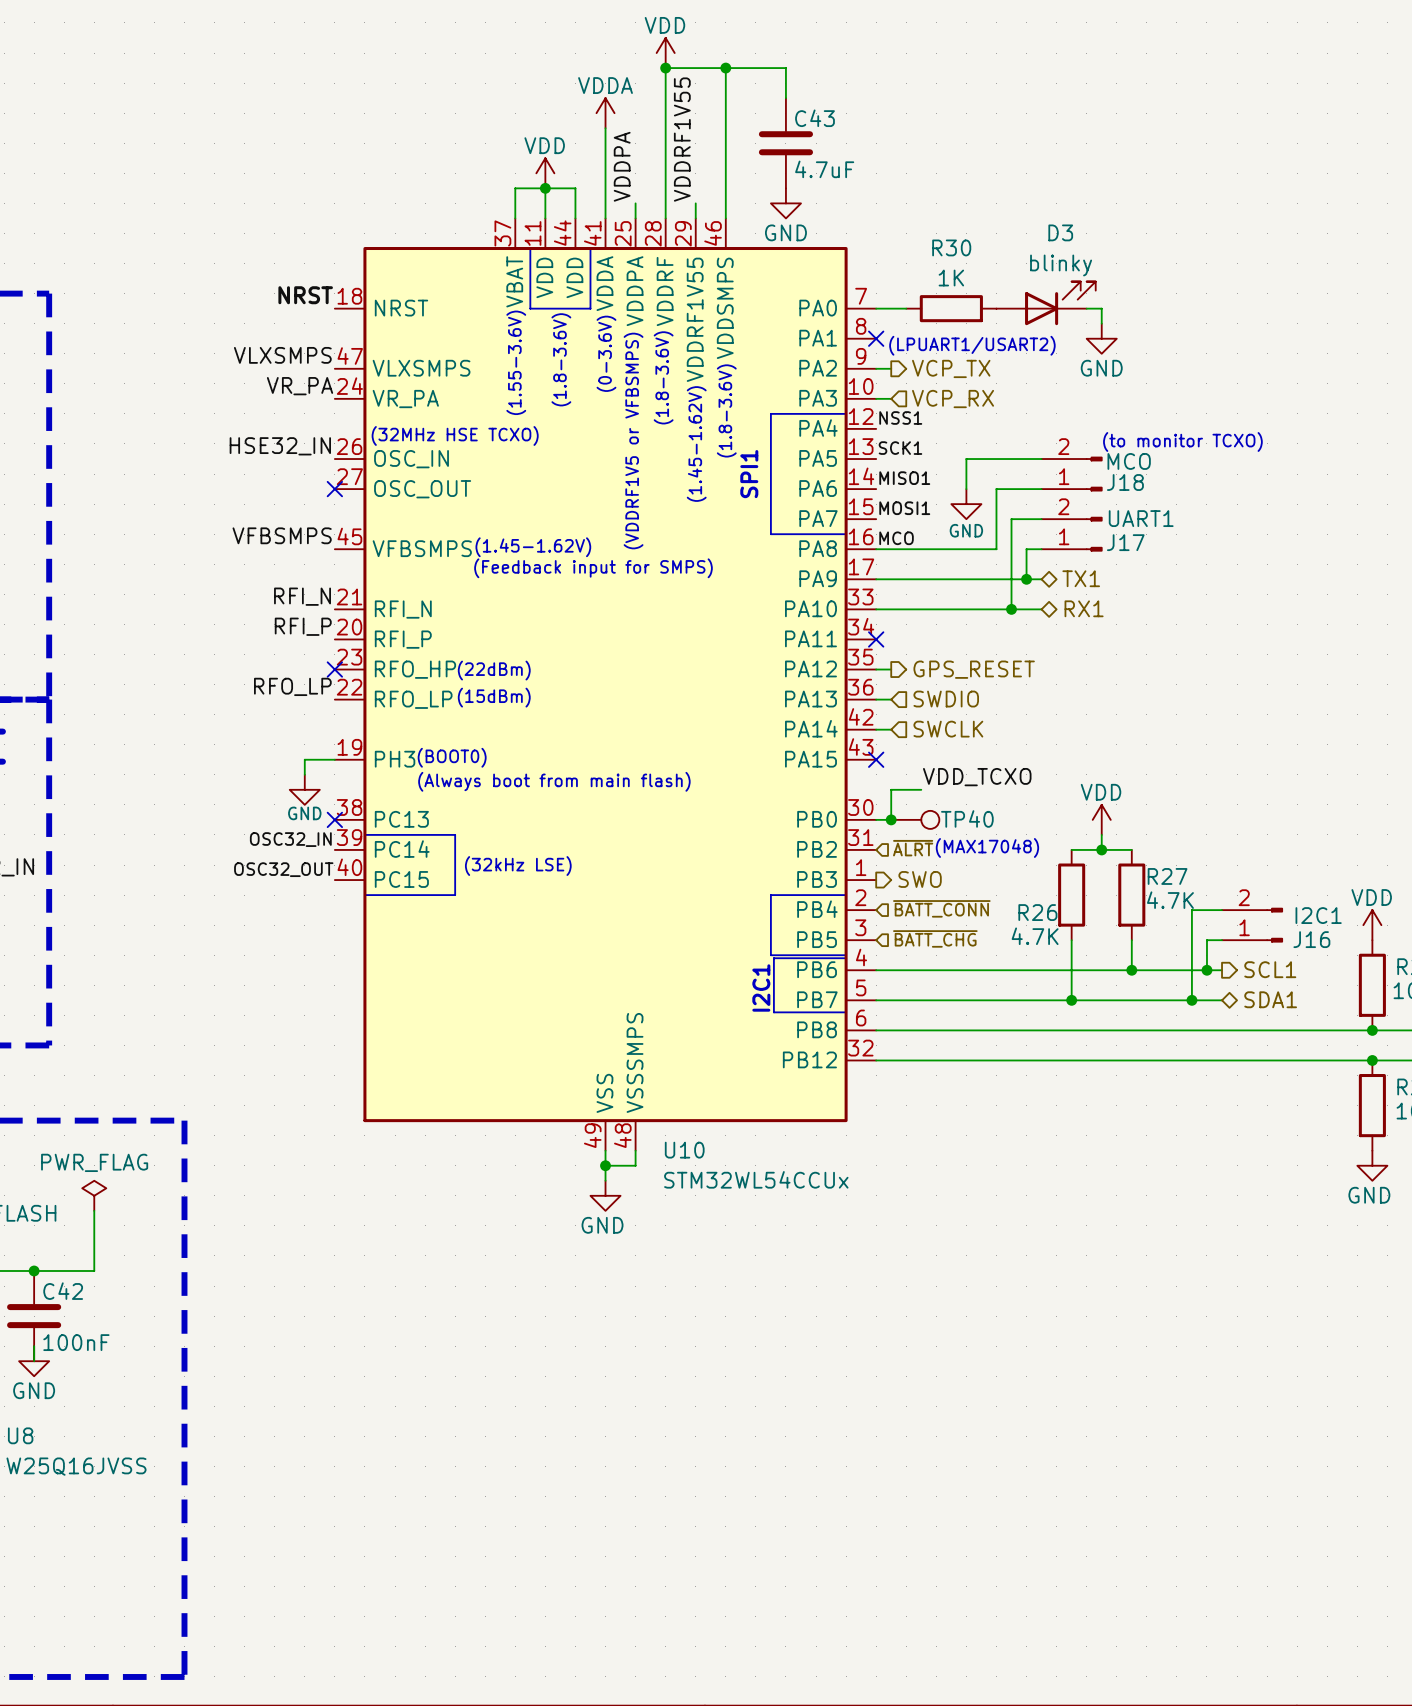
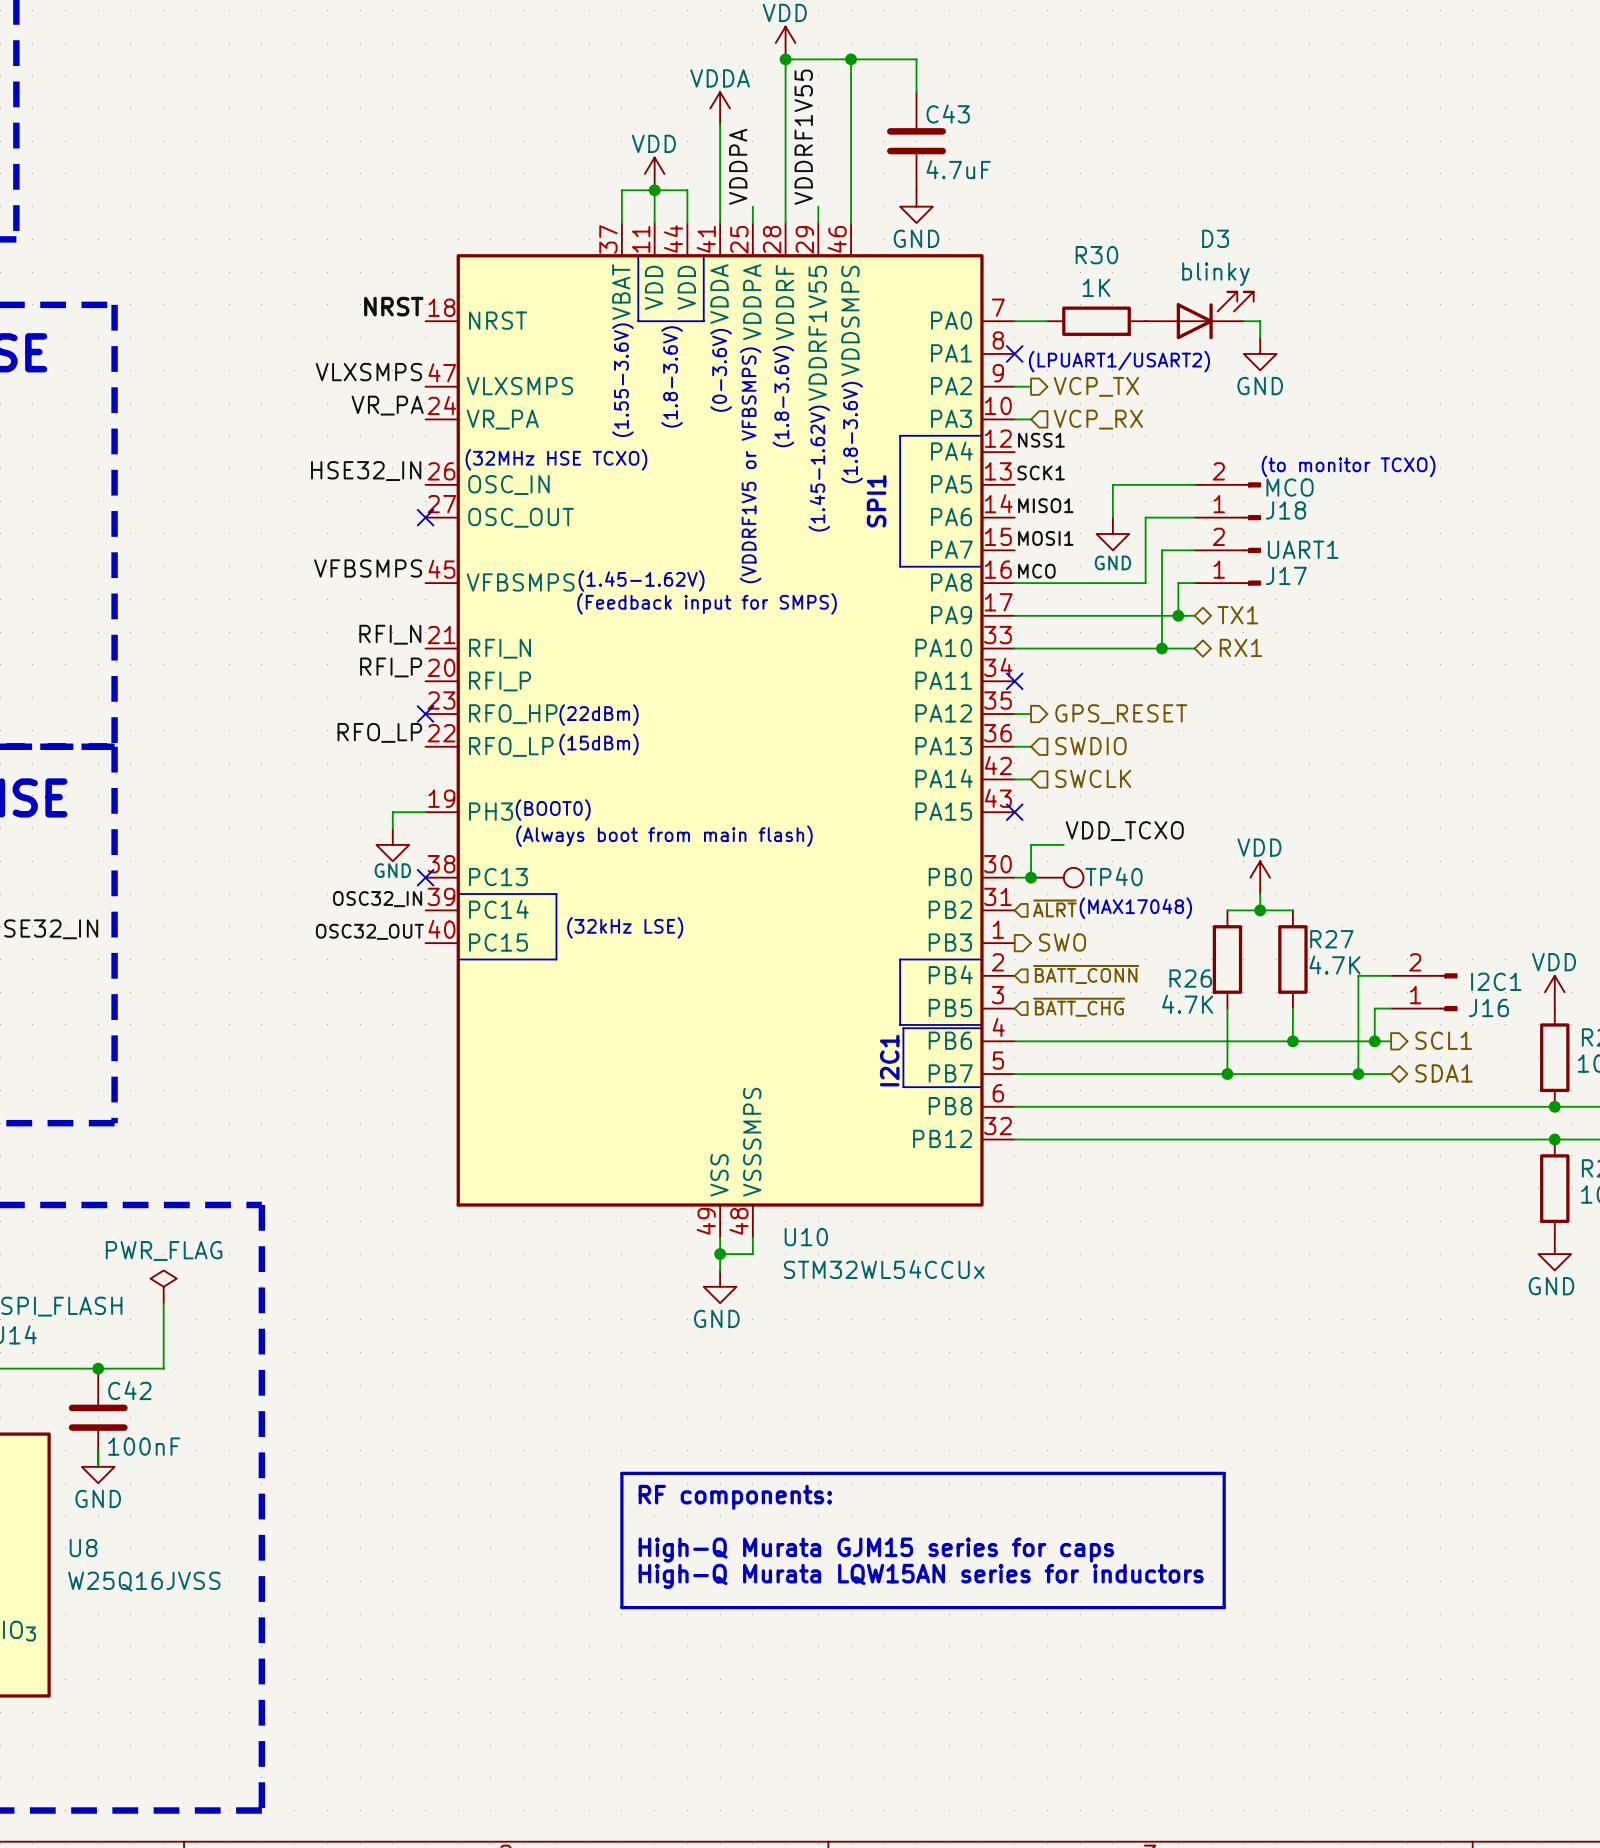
line: none -> (621, 1473) (1224, 1473) (1224, 1607) (621, 1607) (621, 1473)
text: none -> RF components: (735, 1497)
text: none -> High-Q Murata GJM15 series for caps (876, 1550)
text: none -> High-Q Murata LQW15AN series for inductors (921, 1576)

